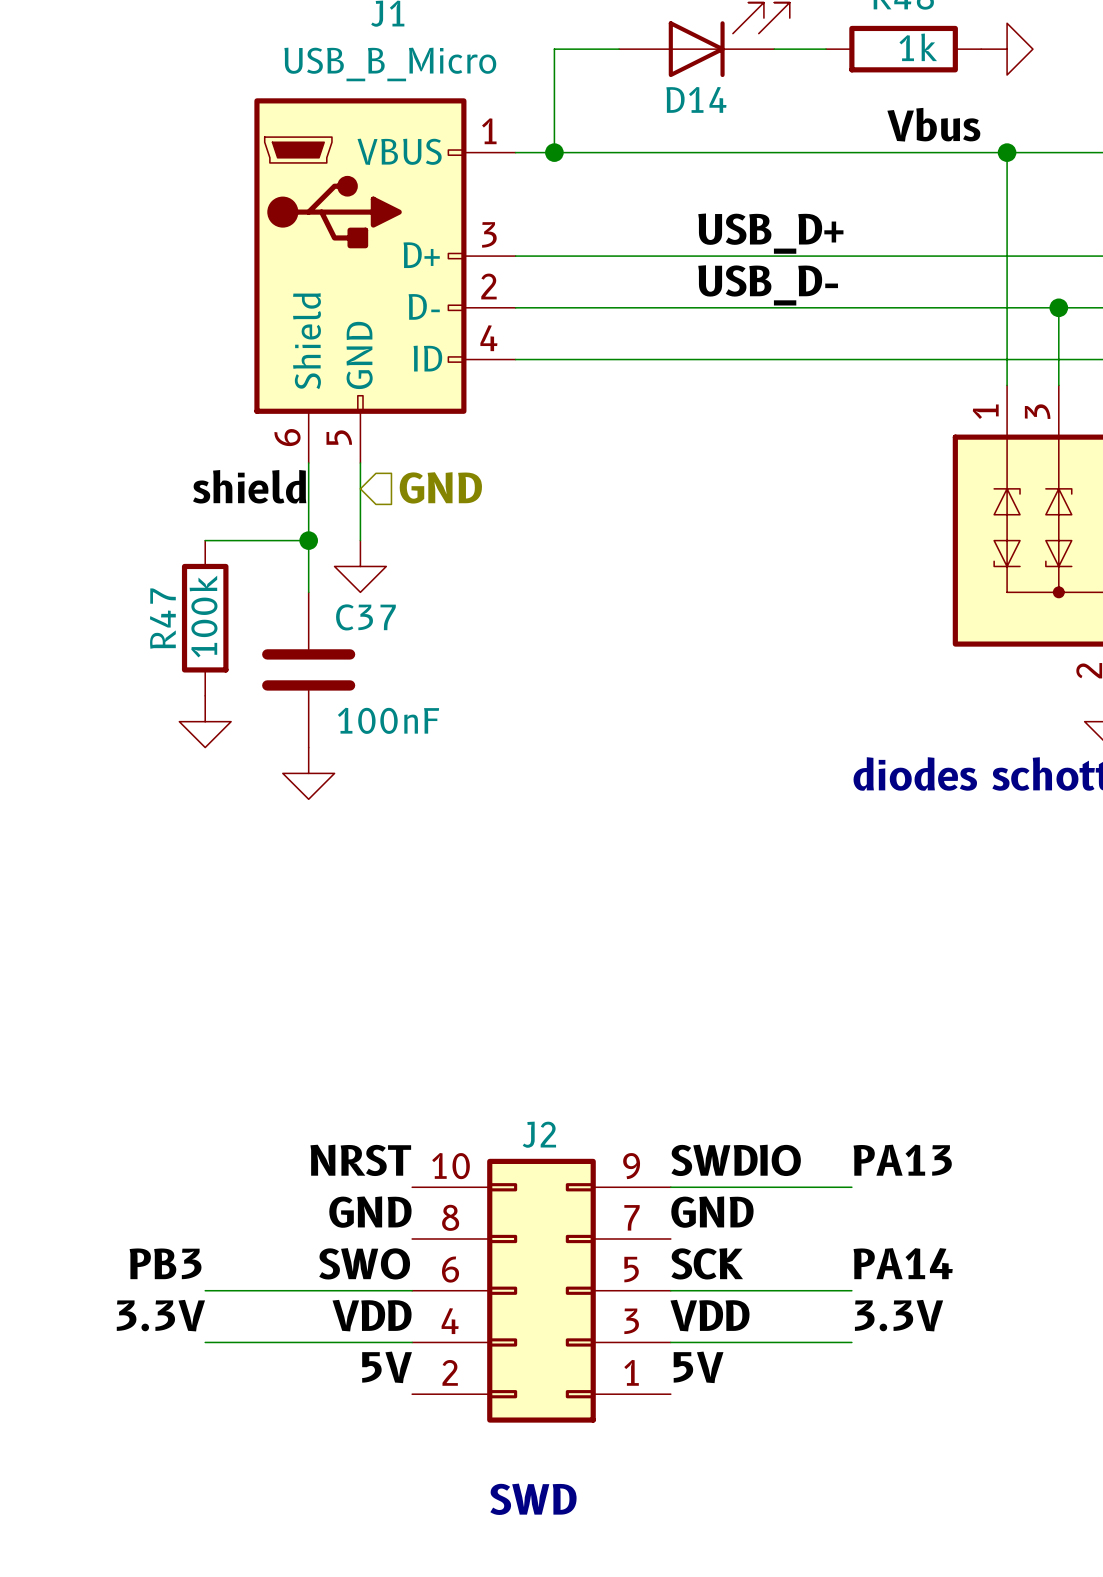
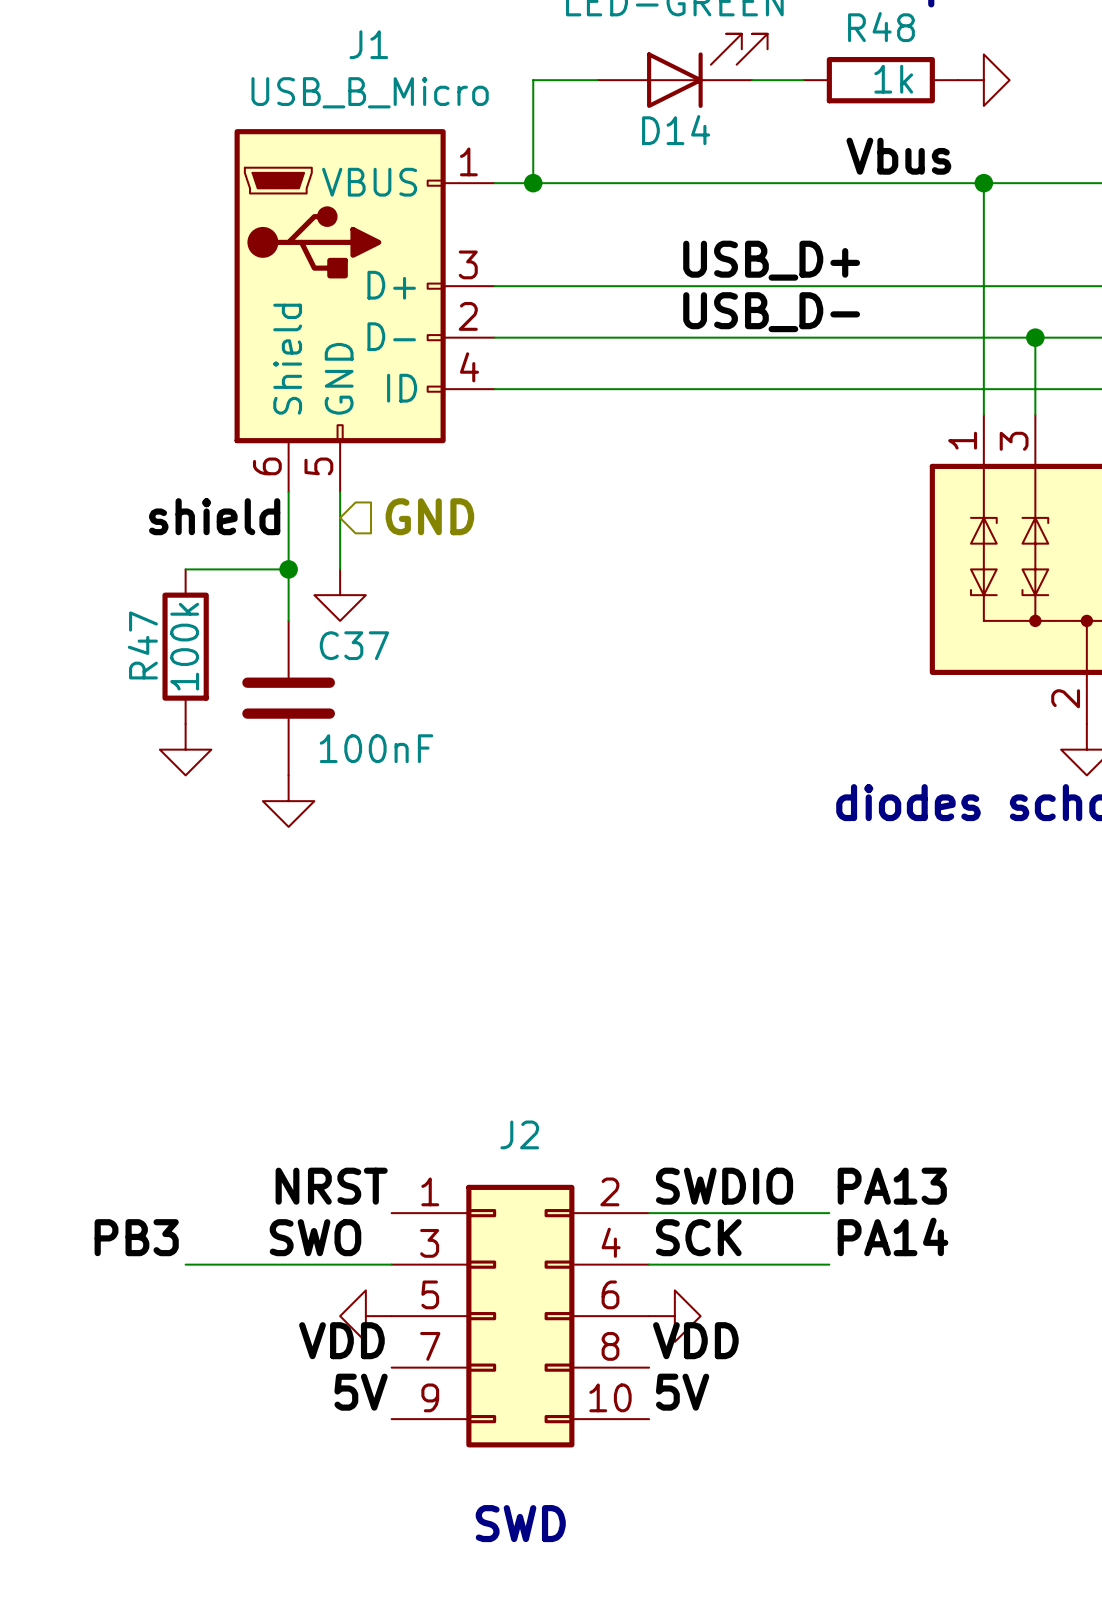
label: GND (370, 1212) -> none
label: GND (712, 1212) -> SCK (698, 1237)
label position: PB3 (165, 1263) -> PB3 (136, 1237)
label position: SWO (364, 1263) -> SWO (315, 1237)
label: SCK (707, 1263) -> none
label position: PA14 (903, 1263) -> PA14 (893, 1236)
wire: (205, 1290) (412, 1290) -> (185, 1264) (391, 1264)
power symbol: none -> (365, 1316)
J2 rotation: 0° (541, 1290) -> 180° (520, 1316)
wire: (670, 1290) (851, 1290) -> (649, 1264) (829, 1264)
power symbol: none -> (674, 1316)
label: 3.3V (160, 1315) -> none
label: 3.3V (899, 1315) -> none
wire: (205, 1342) (412, 1342) -> none
wire: (670, 1342) (851, 1342) -> none

